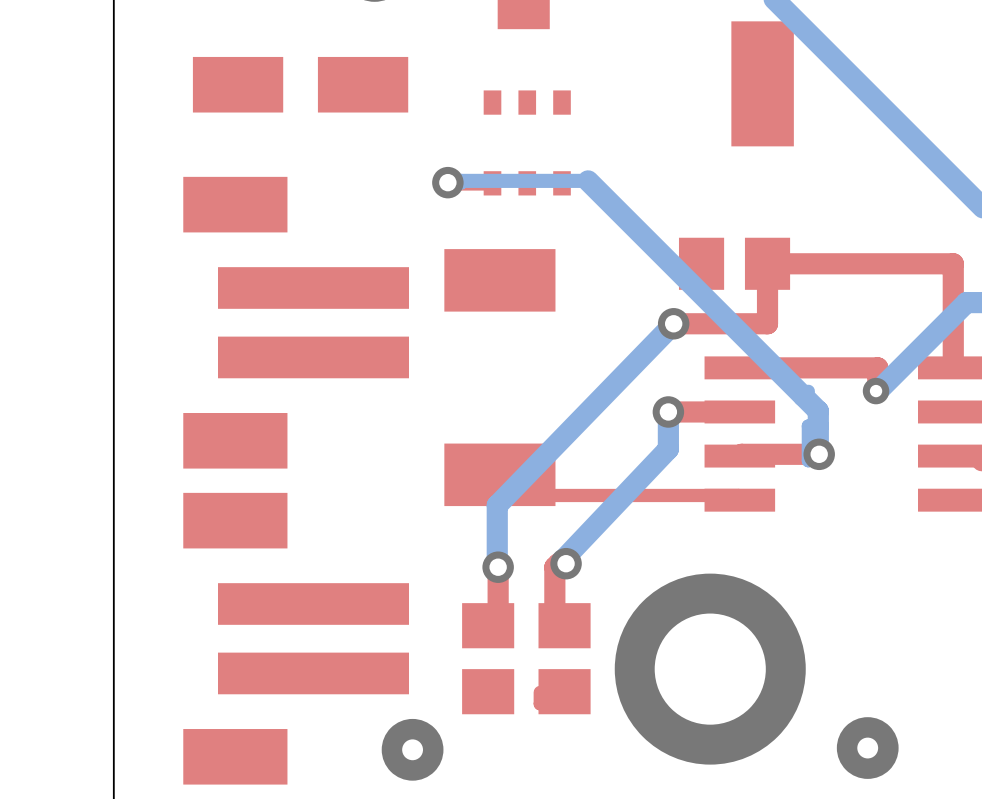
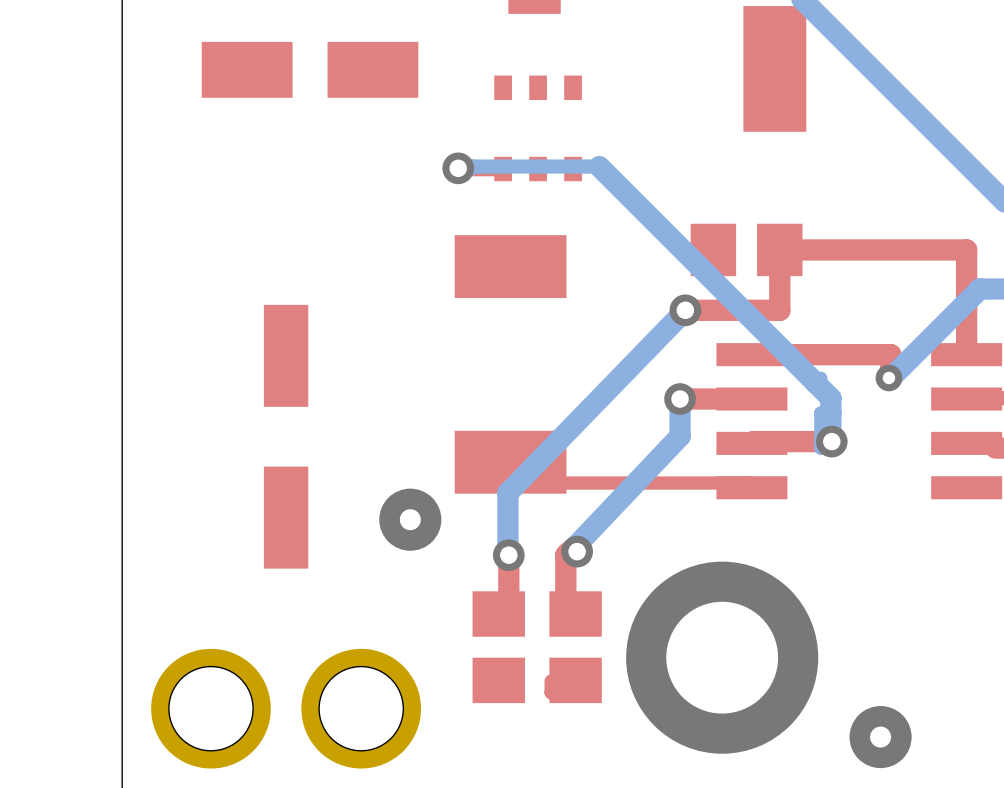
part: (296, 322) -> none
via: none -> (410, 519)
part: none -> (286, 536)
part: (296, 638) -> none
via: (412, 749) -> none

